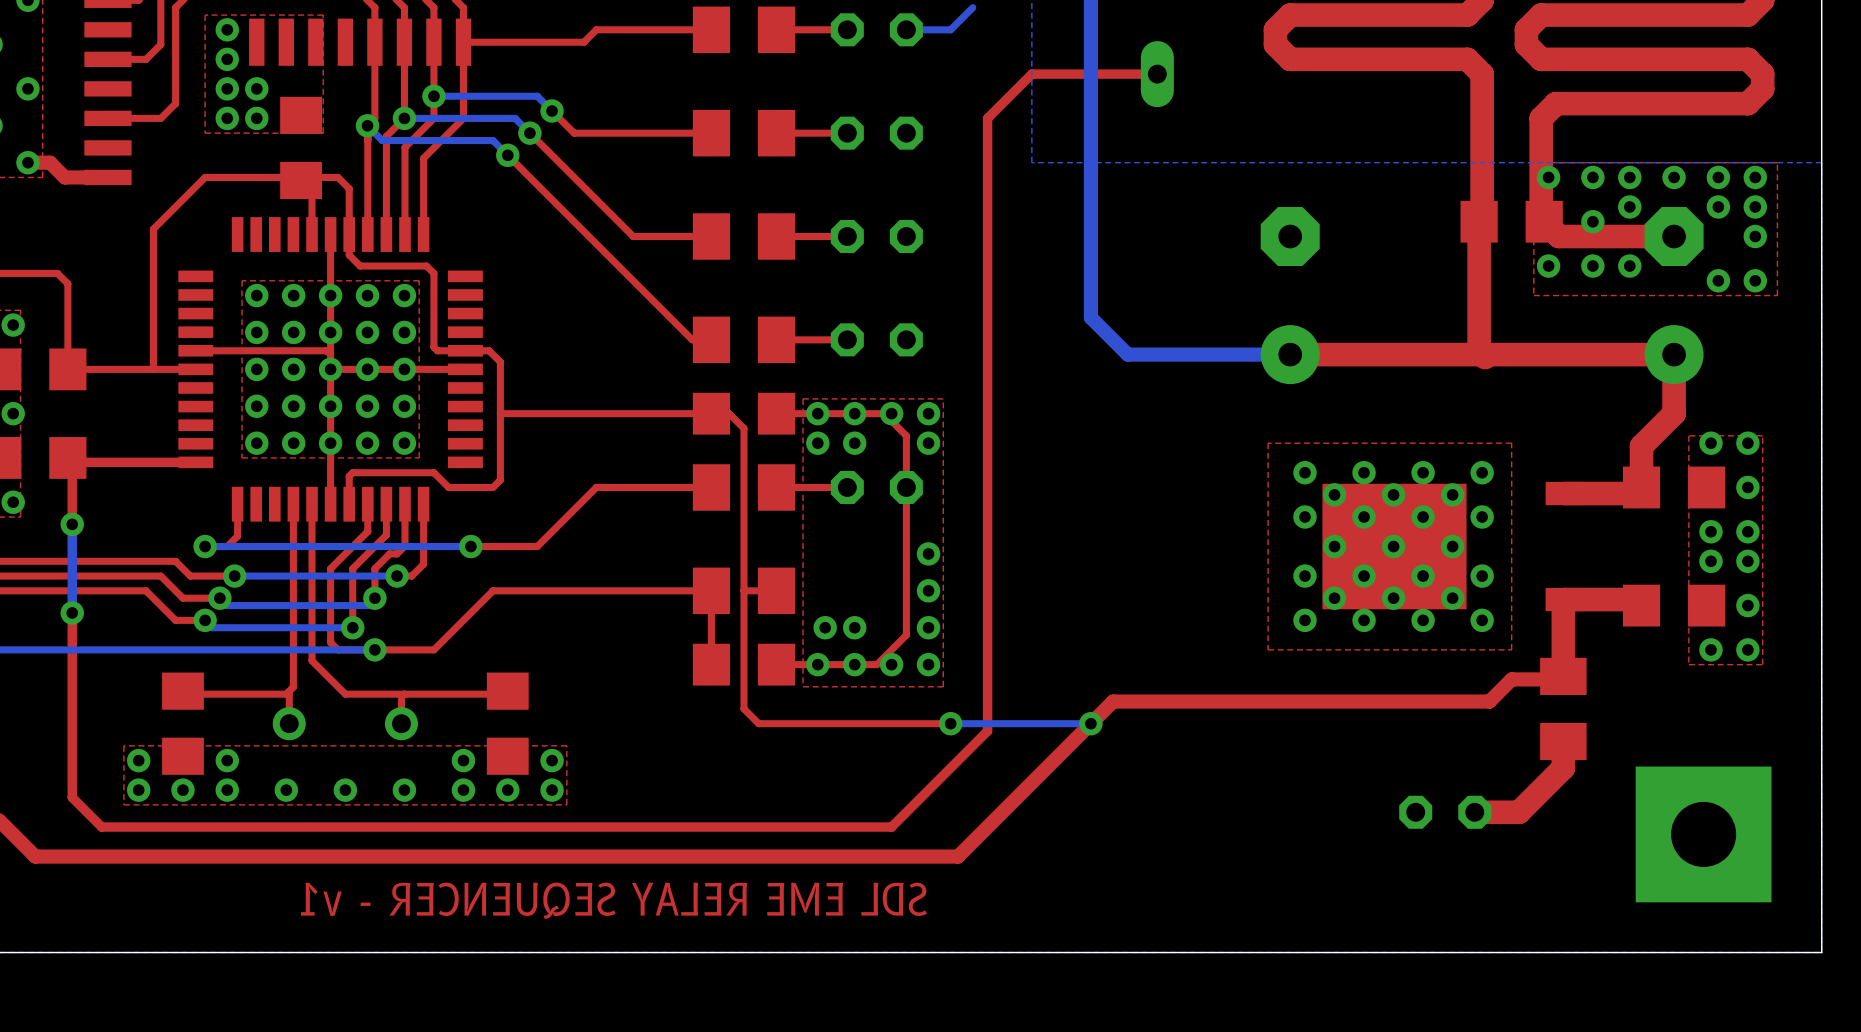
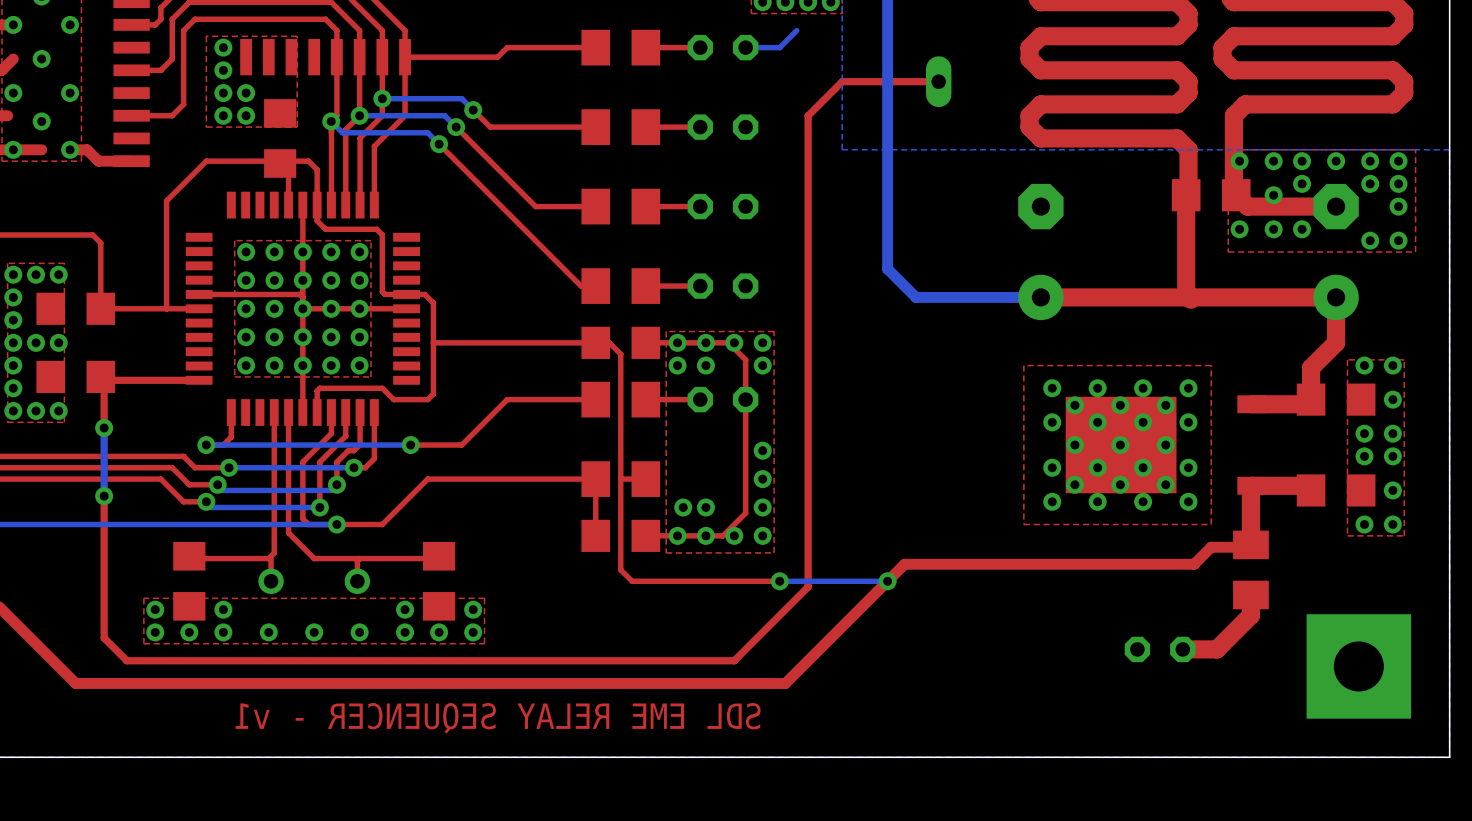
top track: (1482, 88) (1482, 162) -> (1188, 93) (1177, 104) (1040, 104) (1029, 115) (1029, 127) (1040, 138) (1177, 138) (1188, 149)

